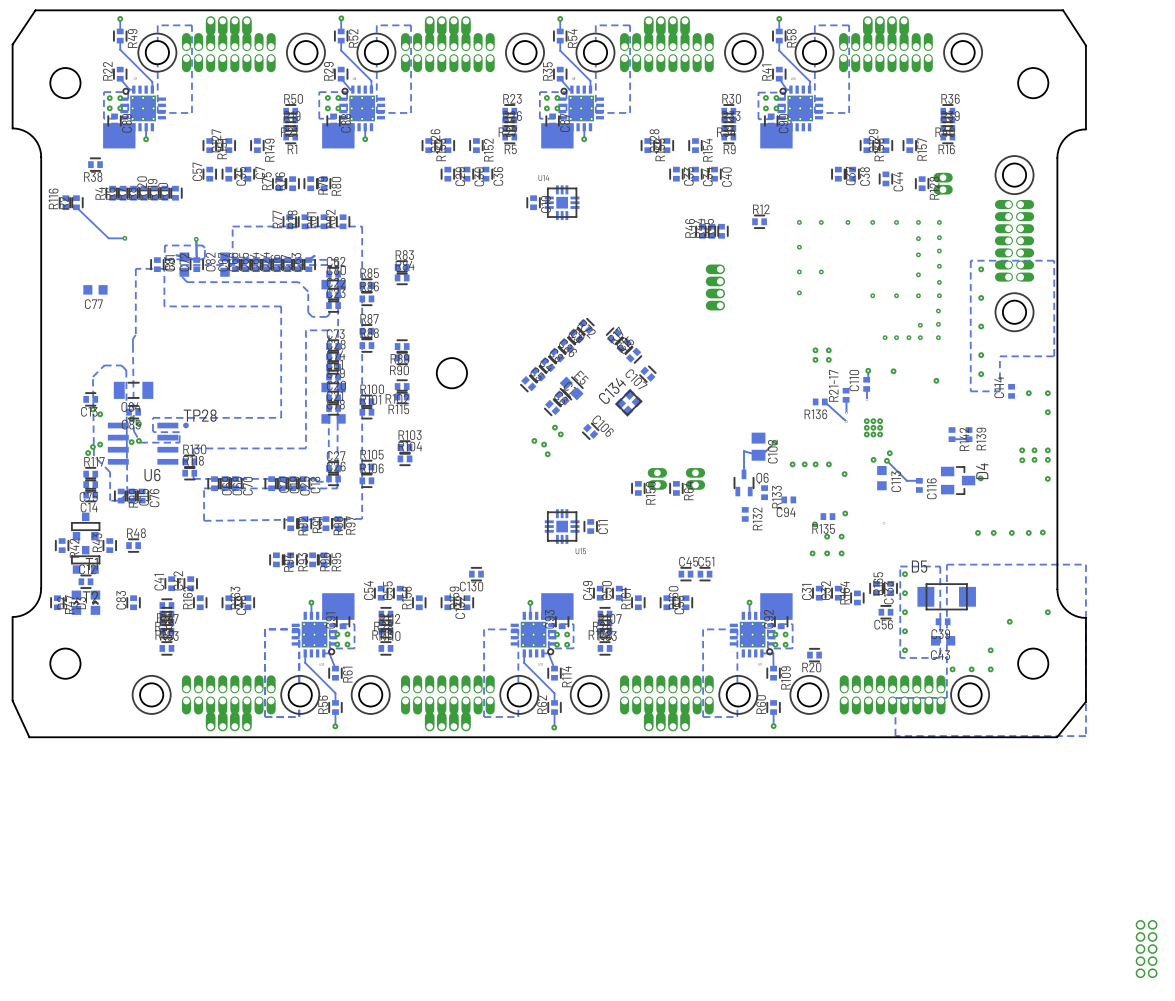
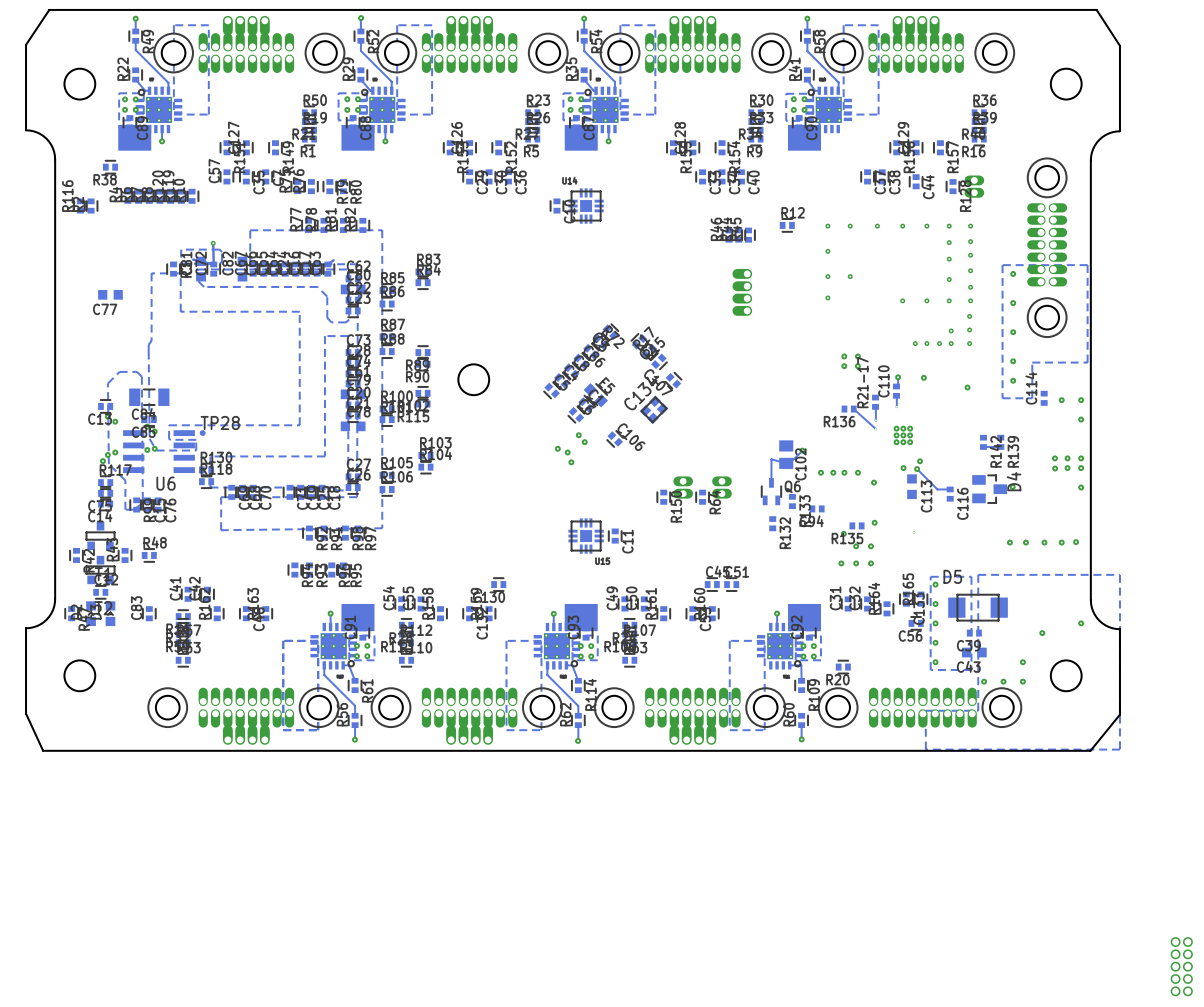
track: (76, 207) (108, 238) (124, 238) -> none
via: (124, 238) -> none

